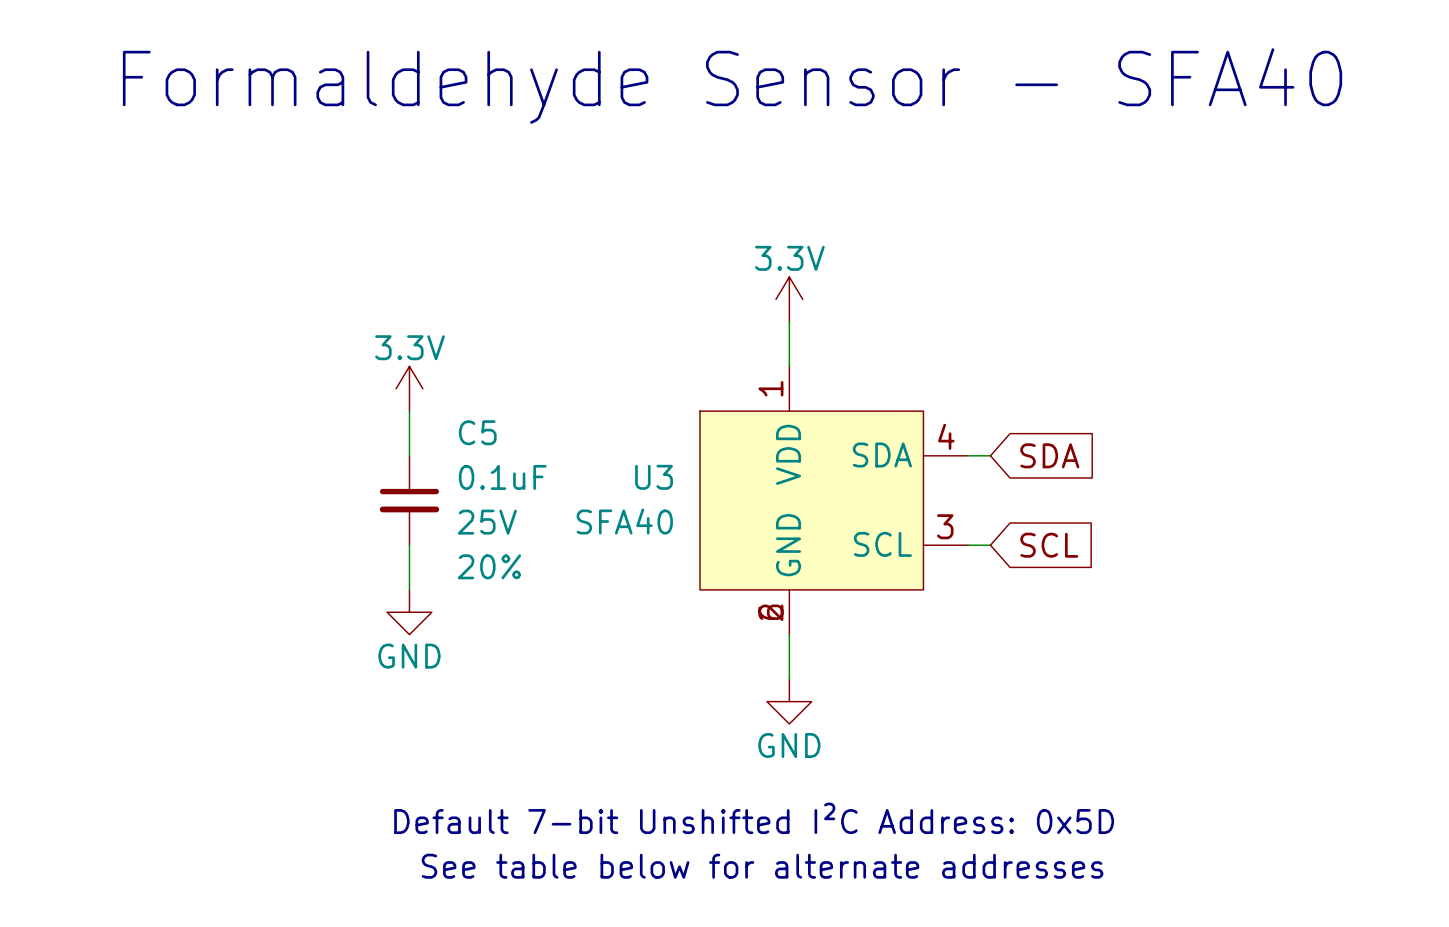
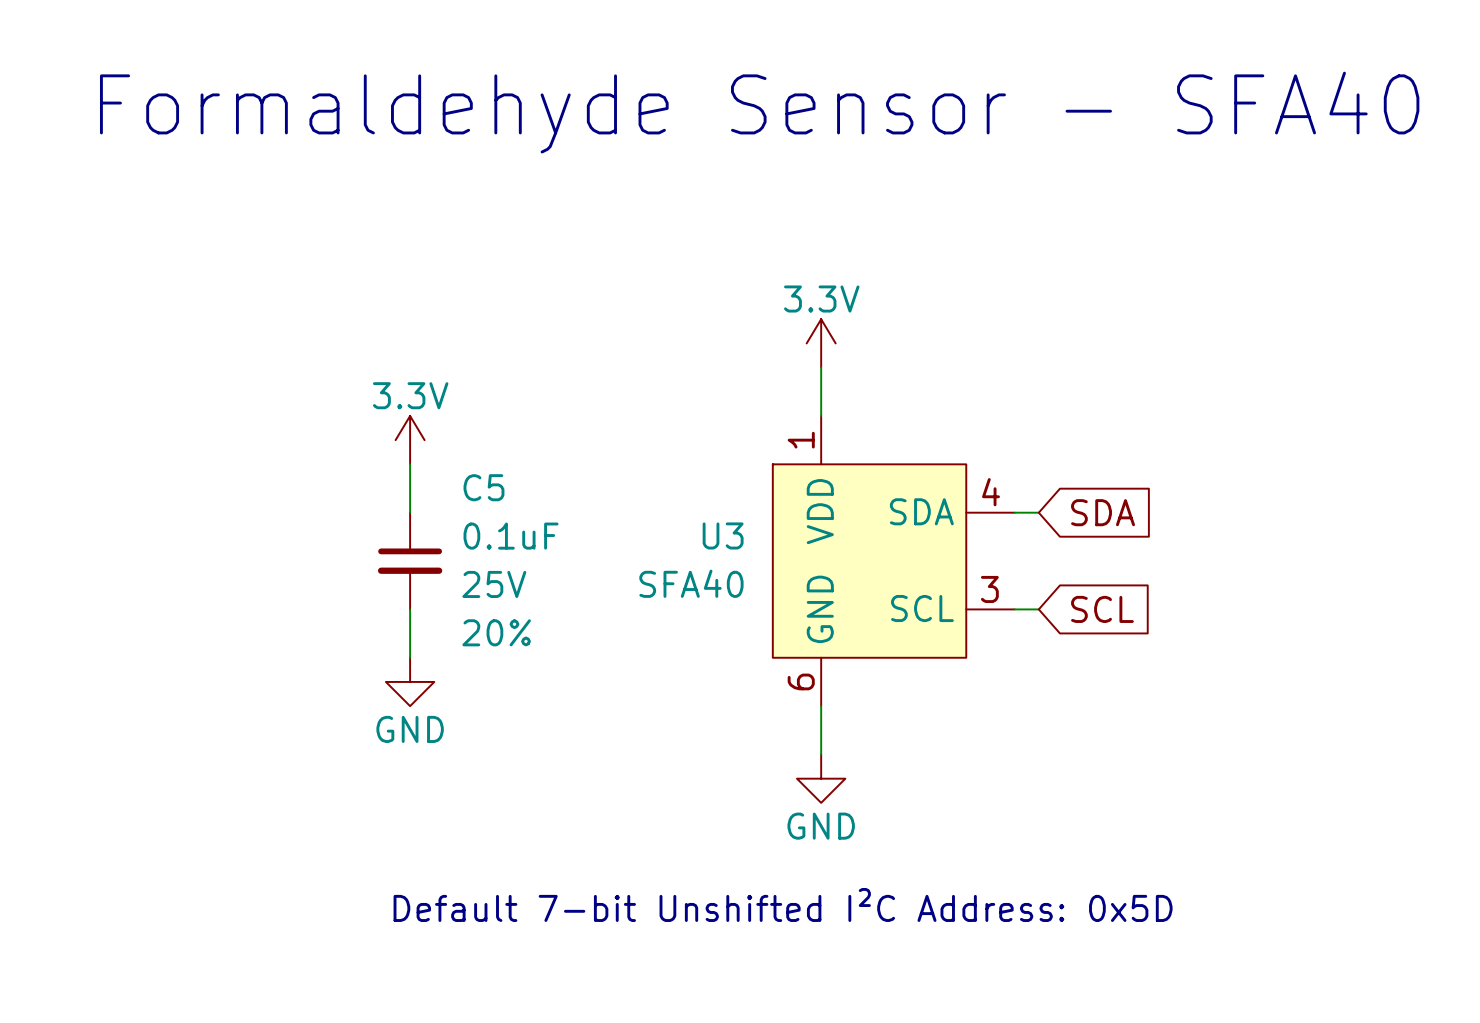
U3 symbol: [699, 366, 969, 635] -> [772, 415, 1015, 707]
text: See table below for alternate addresses (762, 866) -> none

